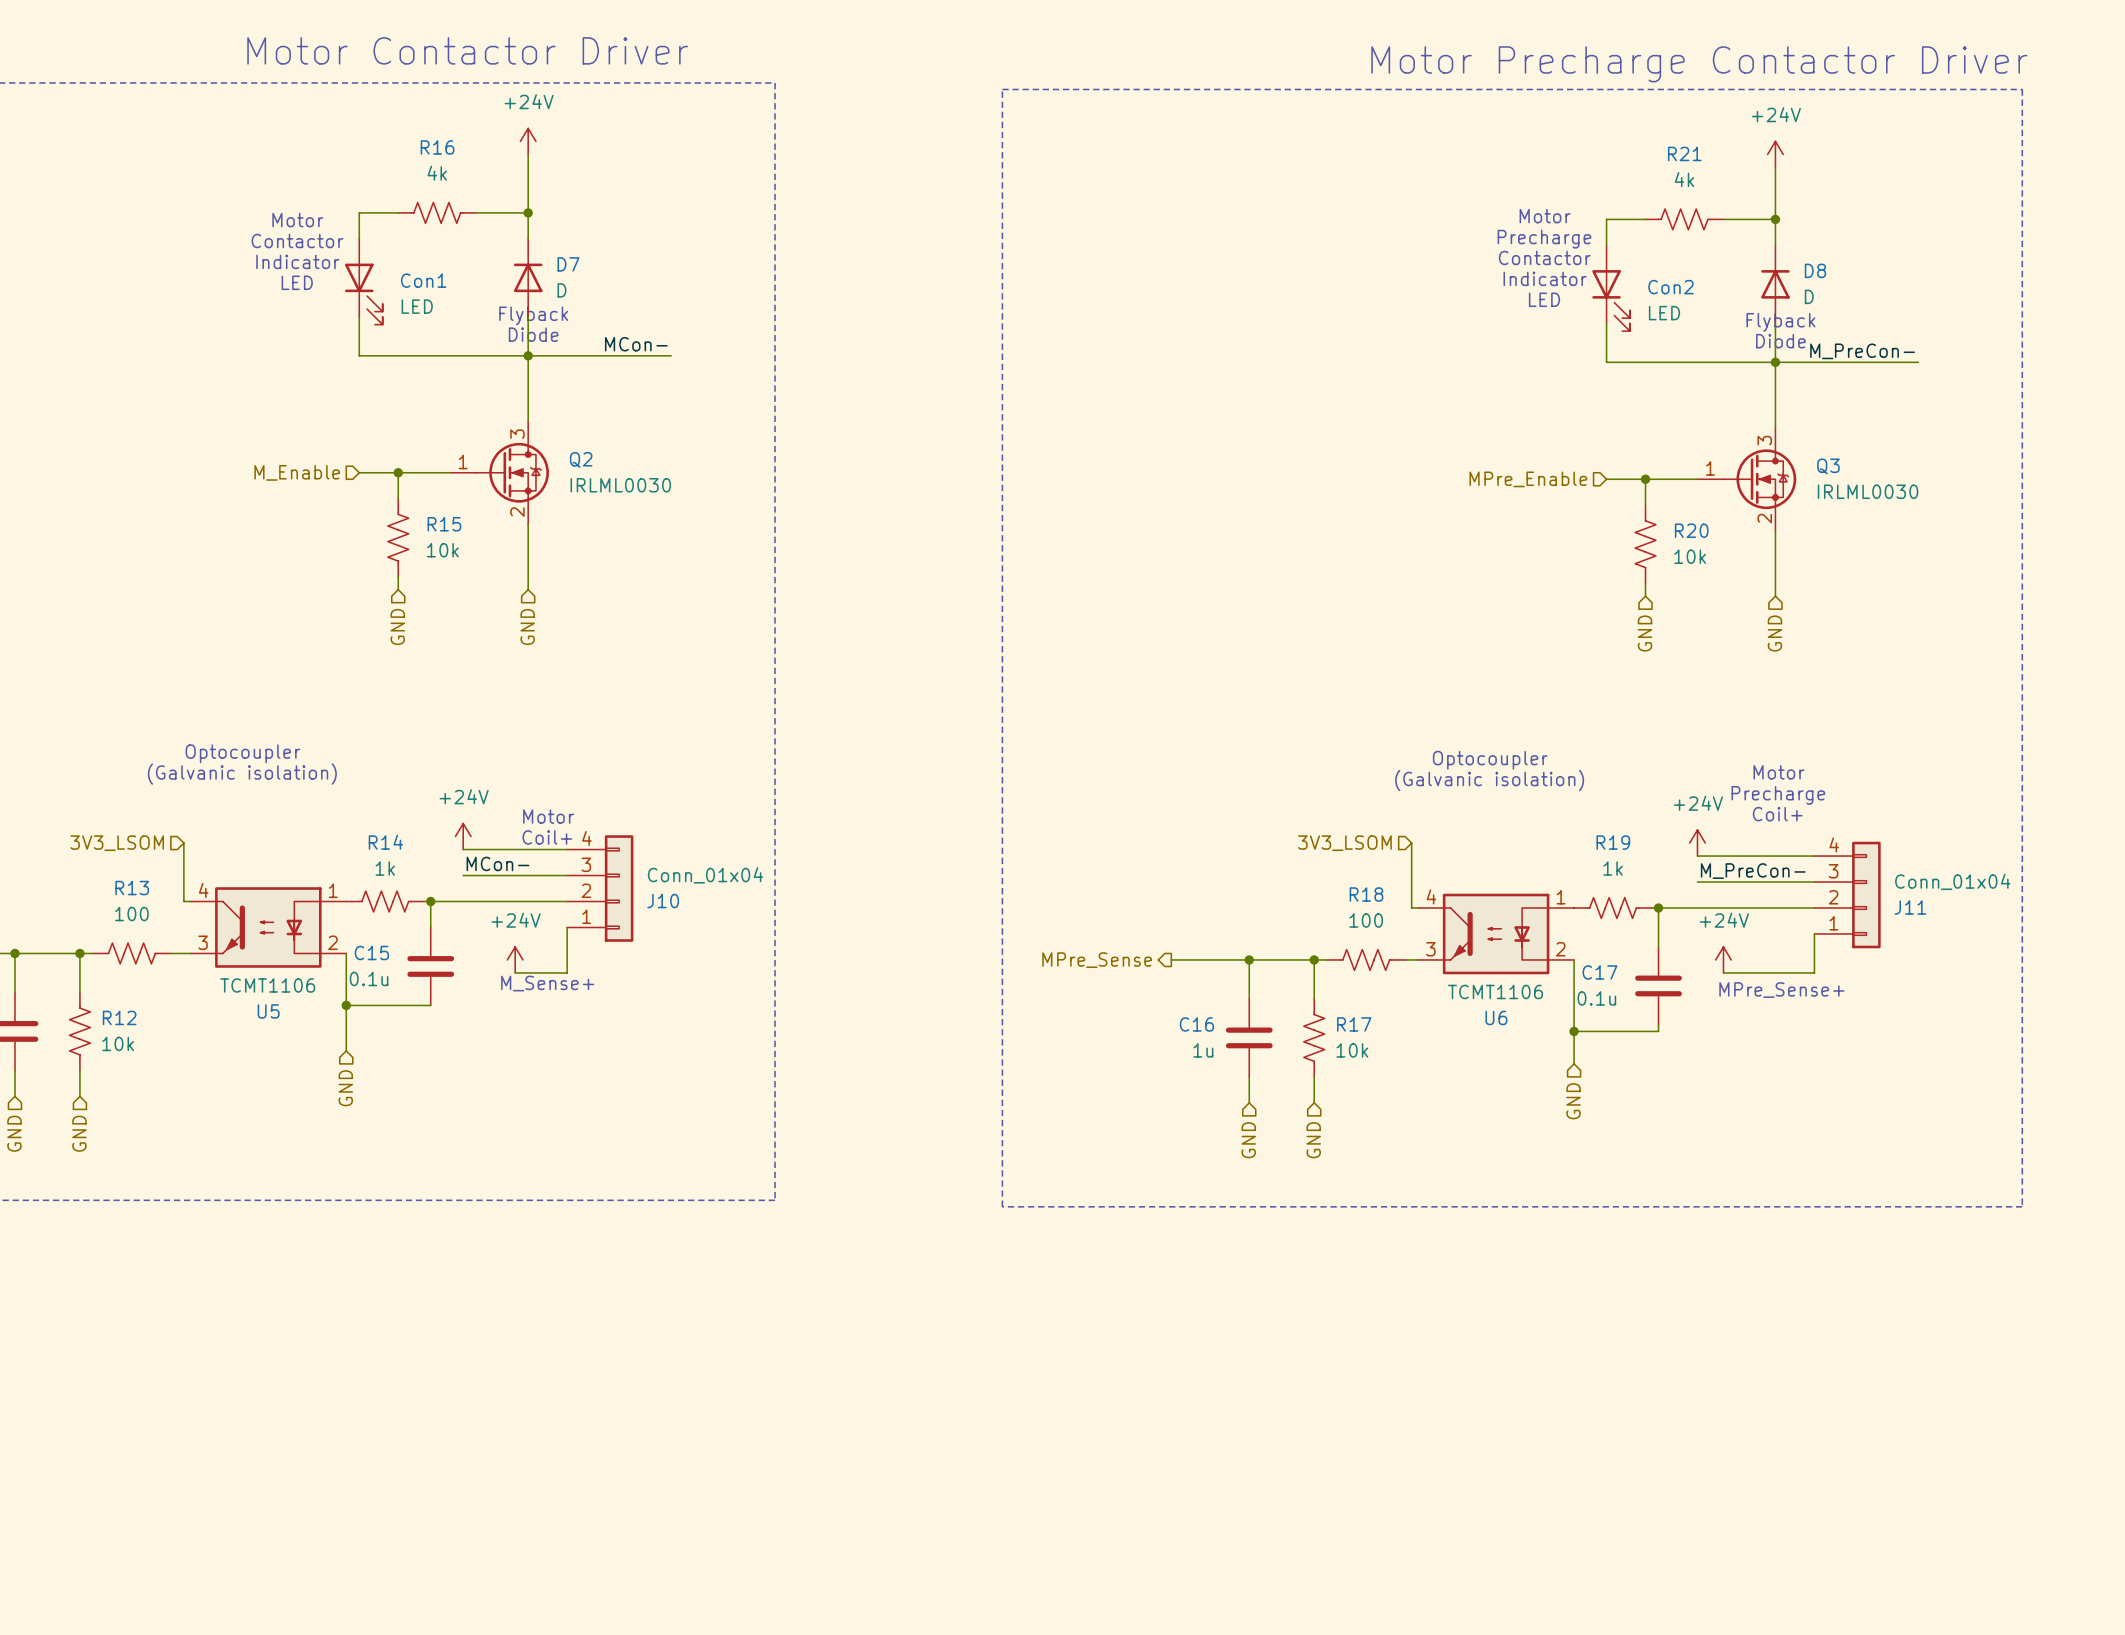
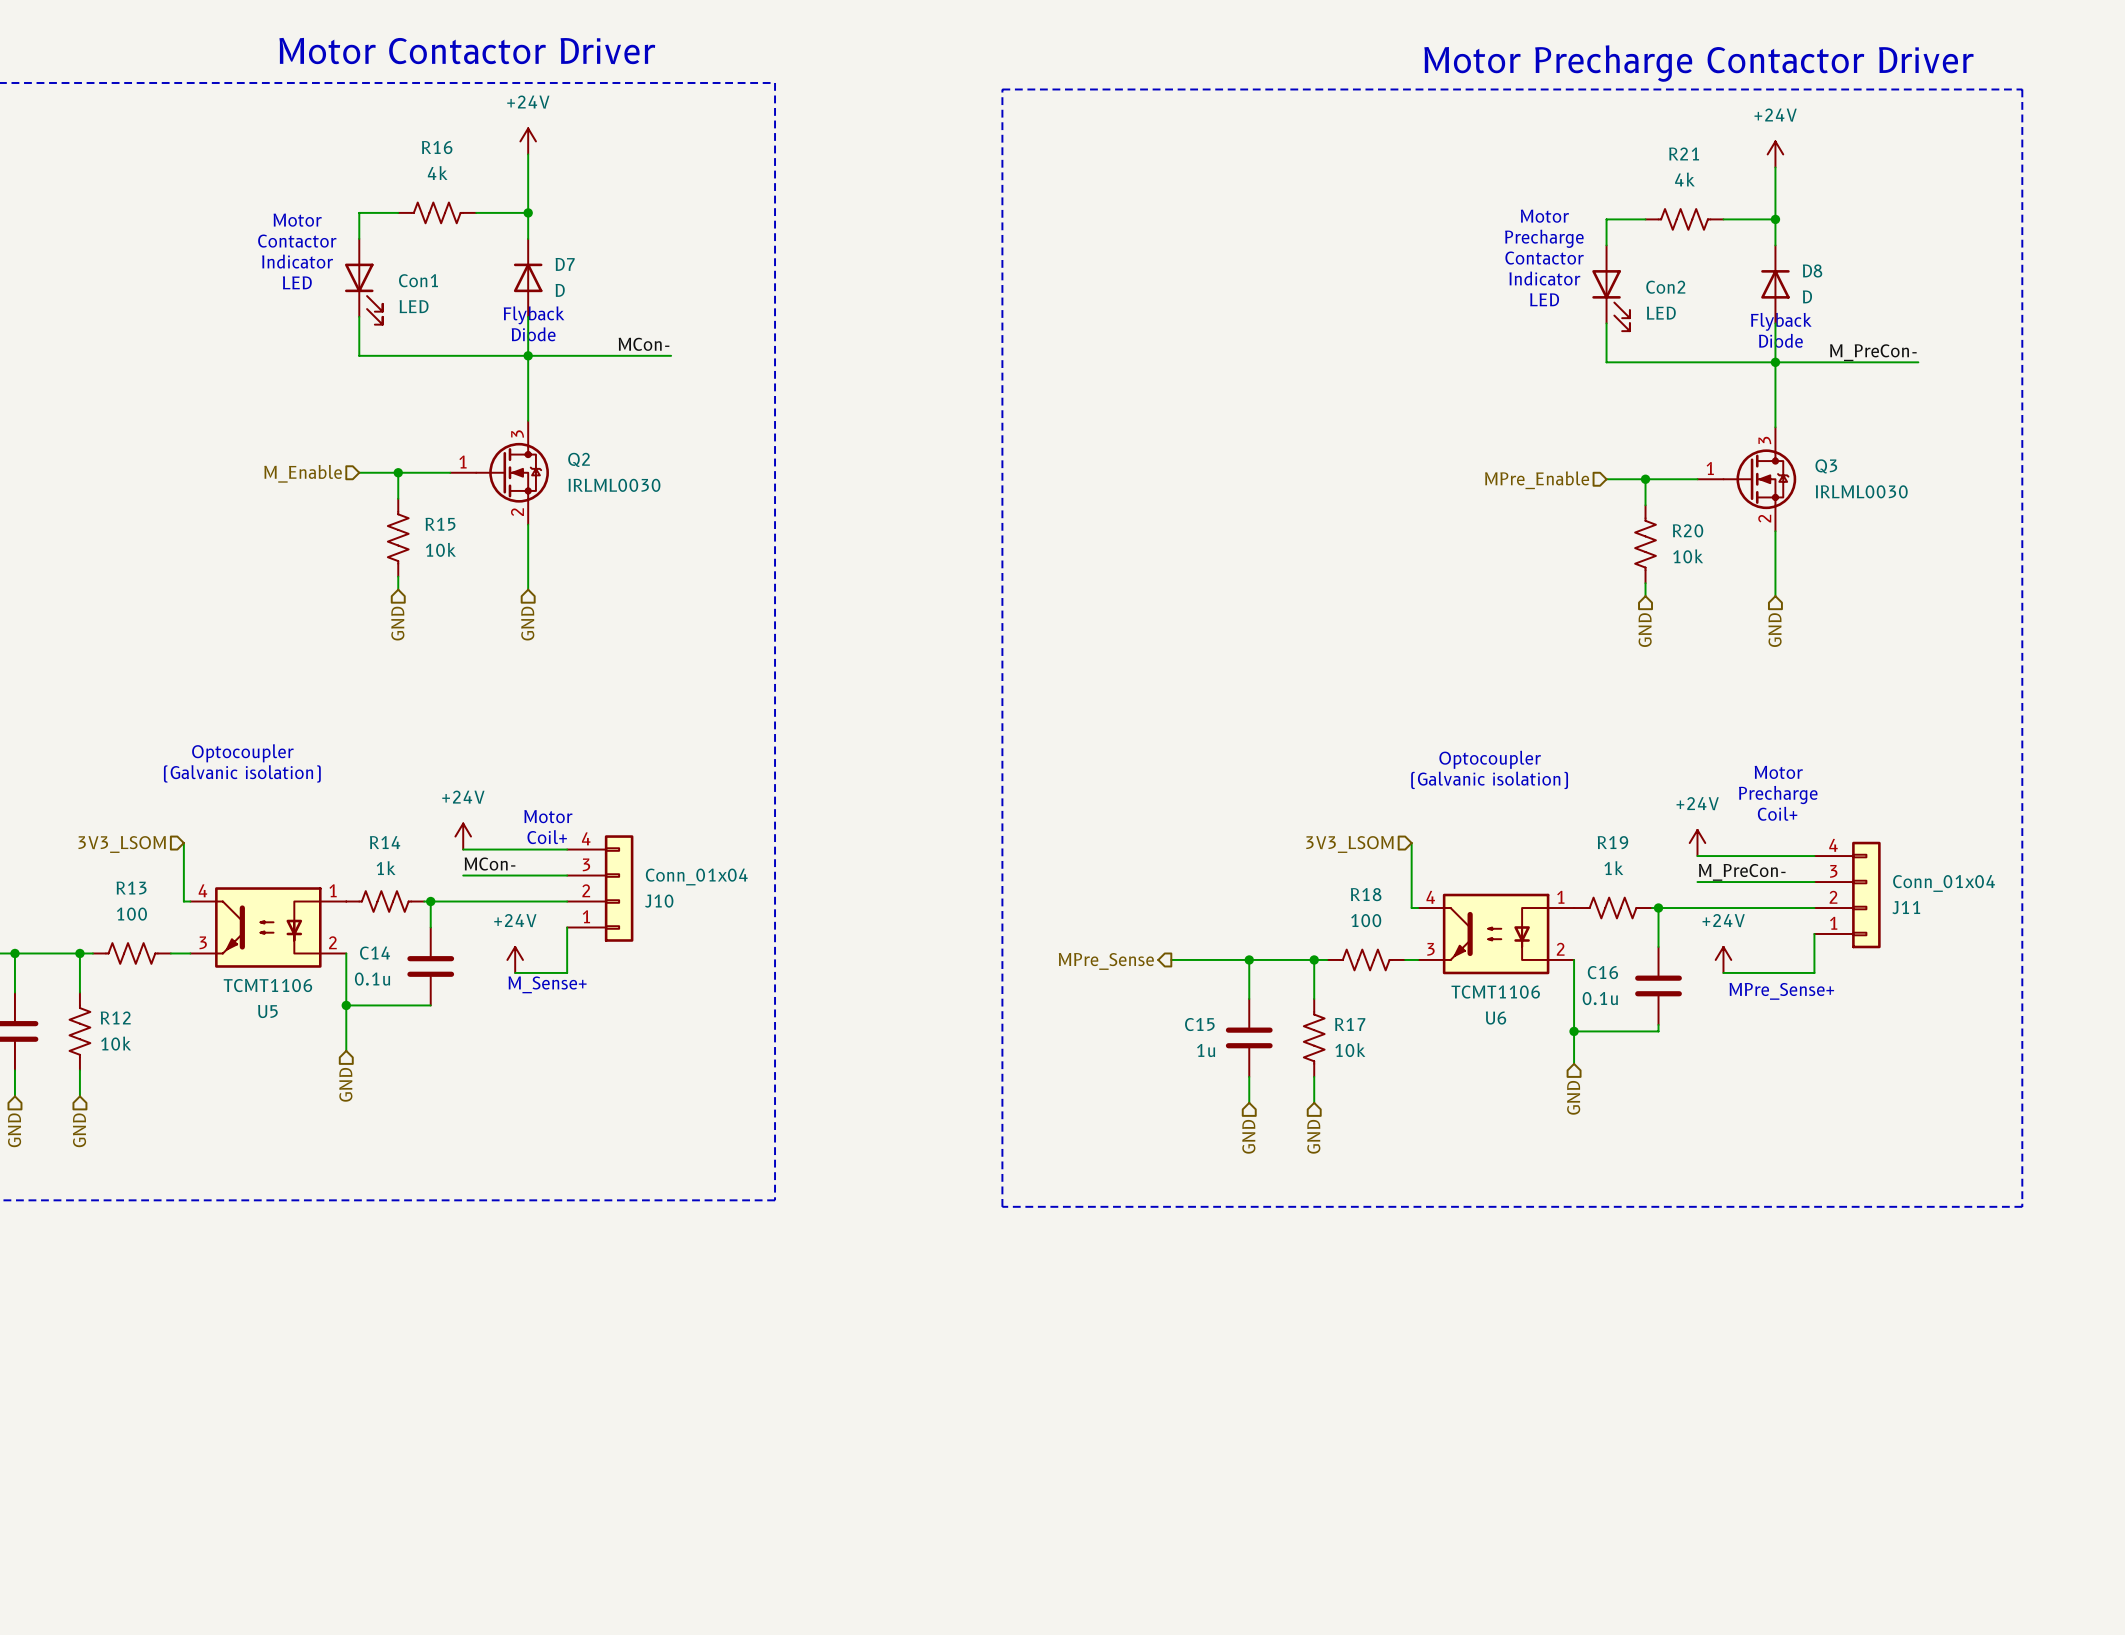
C15 name: C15 (371, 952) -> C14 (375, 953)
C17 name: C17 (1599, 972) -> C16 (1602, 972)
C16 name: C16 (1196, 1024) -> C15 (1199, 1024)

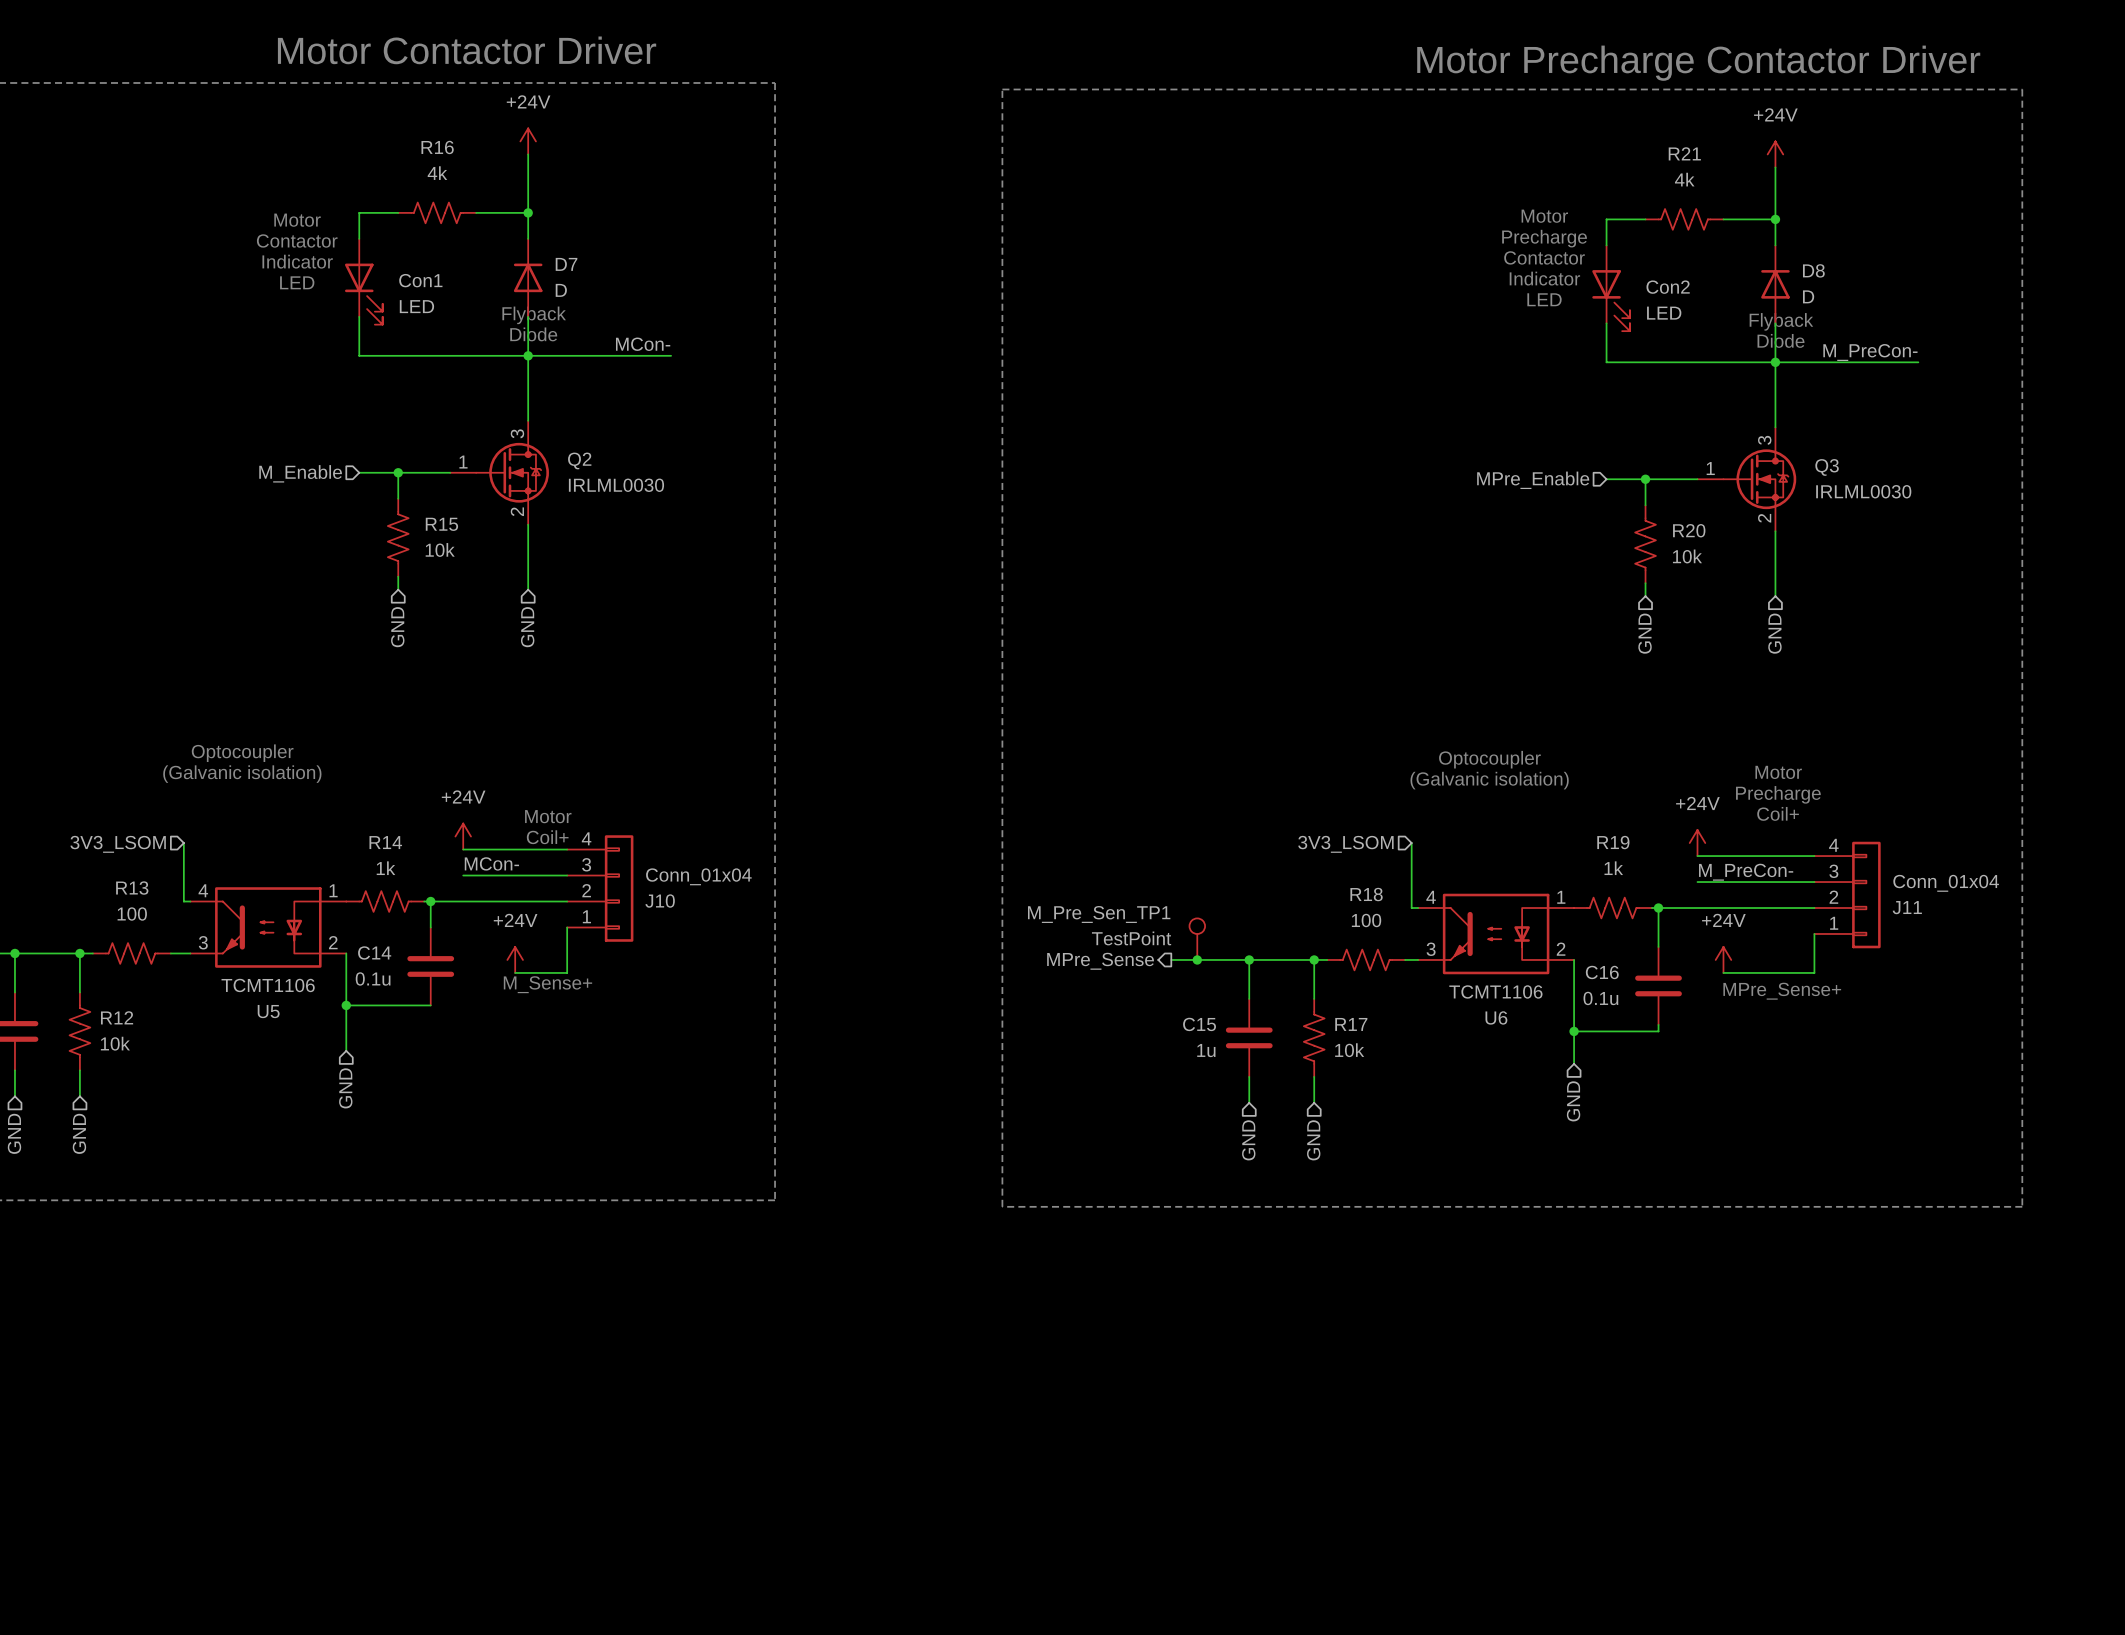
M_Pre_Sen_TP1: none -> TestPoint (1197, 939)
junction: none -> (1197, 959)

